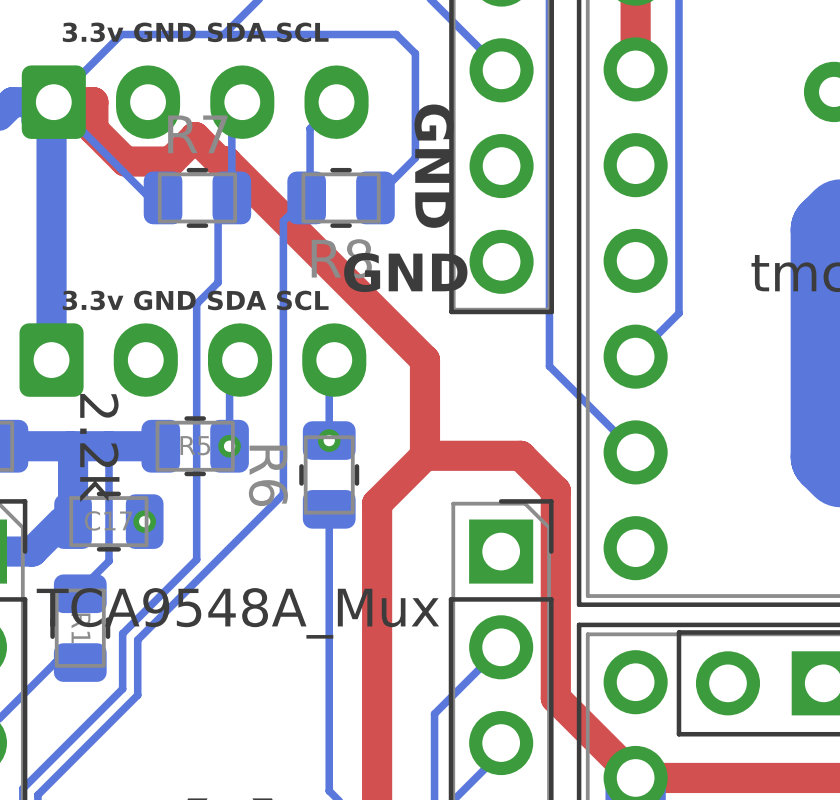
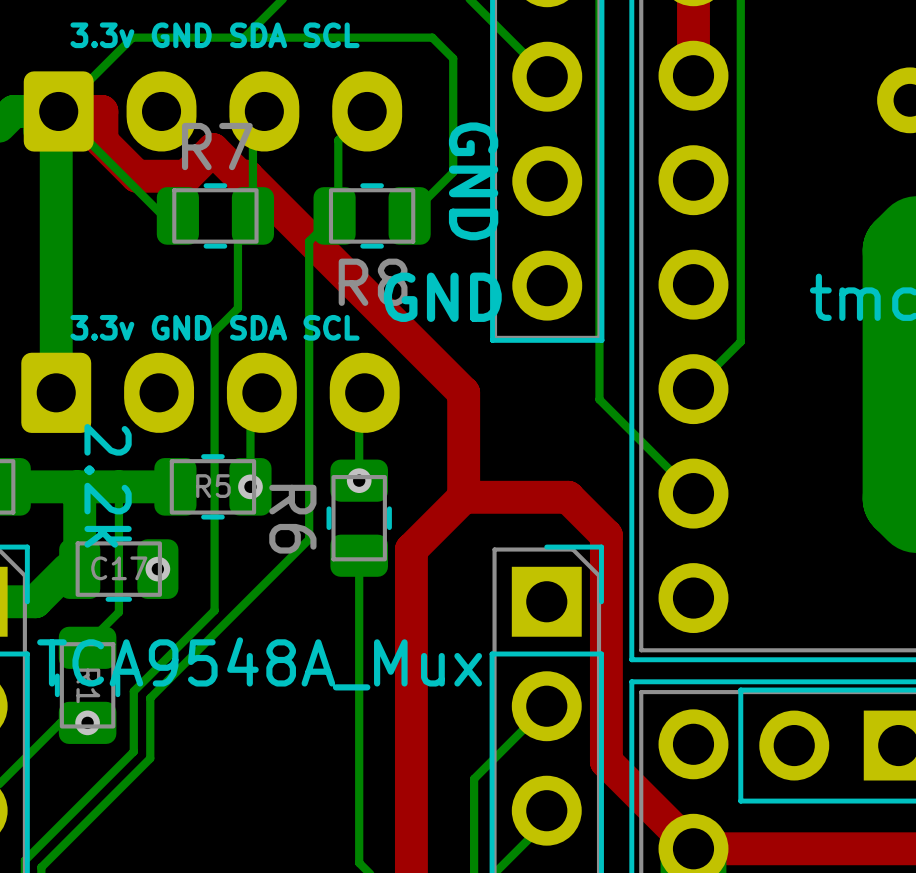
via: none -> (87, 722)

